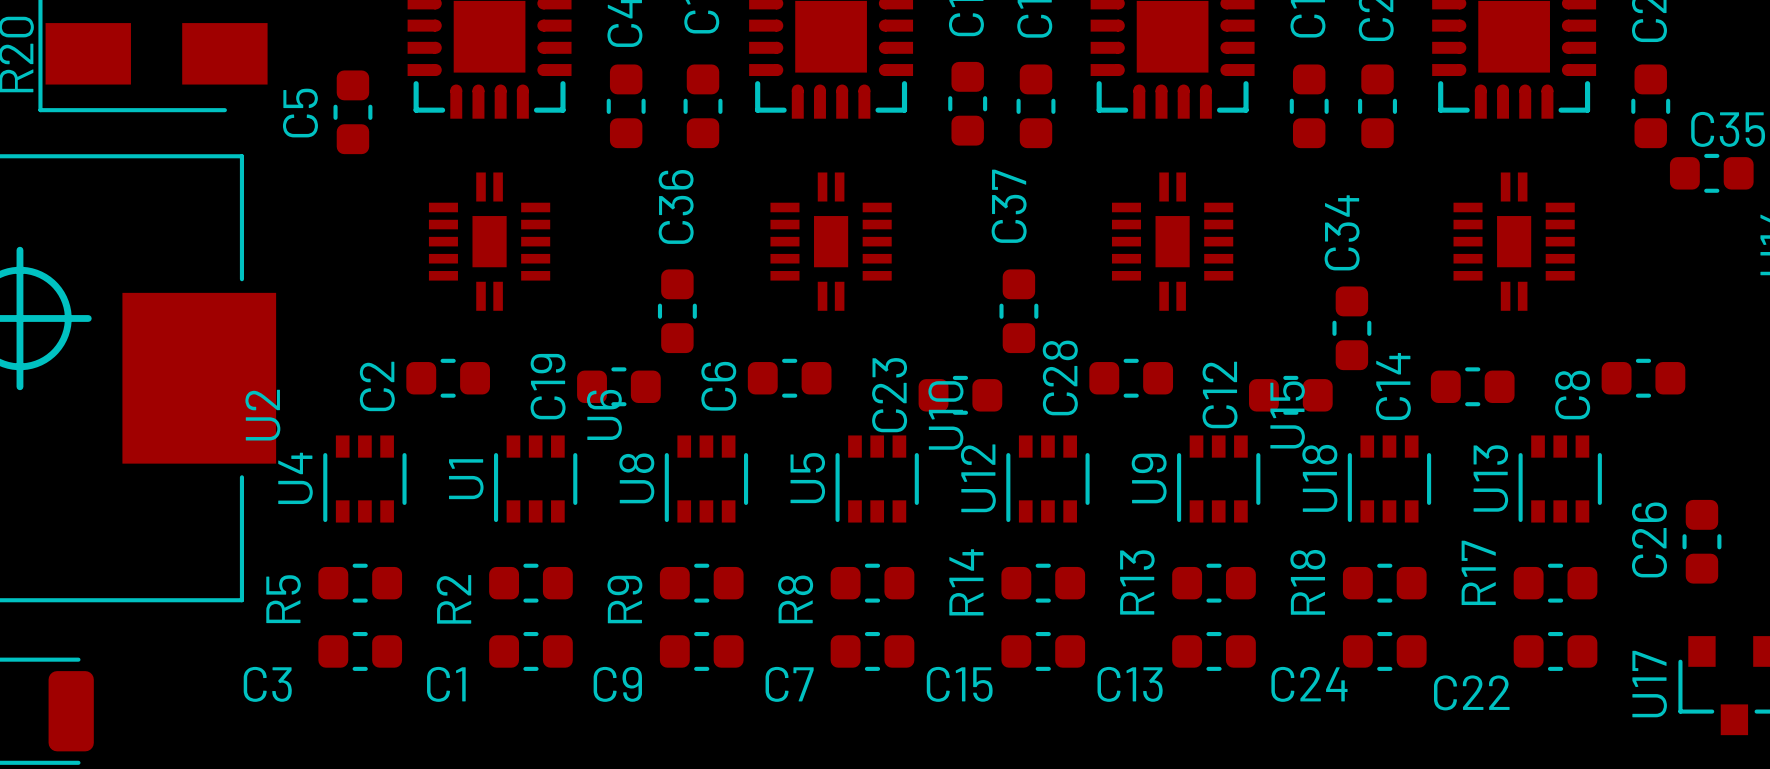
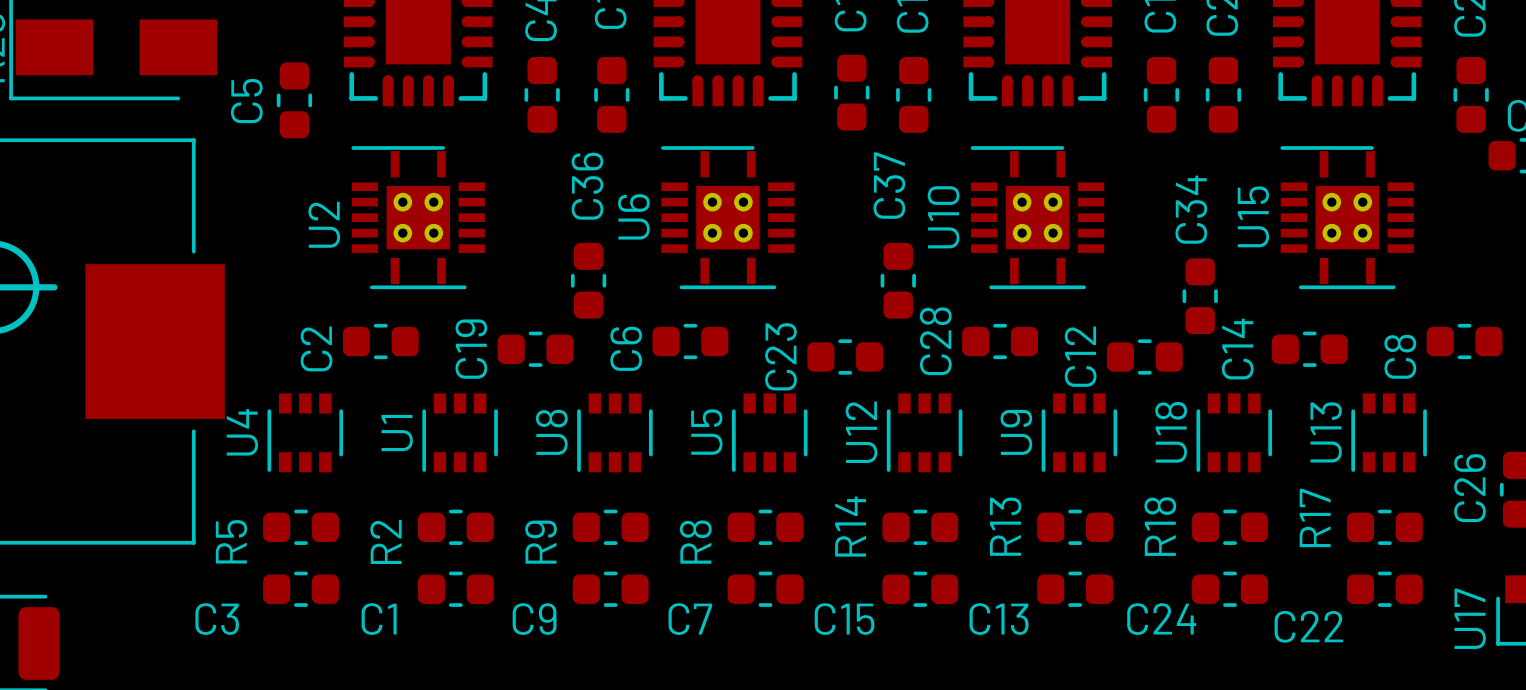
U2 footprint: [428, 172, 551, 311] -> [351, 146, 485, 290]
U6 footprint: [770, 172, 892, 311] -> [661, 146, 795, 290]
U10 footprint: [1111, 172, 1234, 311] -> [970, 146, 1105, 290]
U15 footprint: [1453, 172, 1575, 311] -> [1280, 146, 1414, 290]
U6 name position: U6 (604, 414) -> U6 (633, 216)
U15 name position: U15 (1287, 414) -> U15 (1253, 216)
U2 name position: U2 (262, 415) -> U2 (324, 224)
U10 name position: U10 (945, 415) -> U10 (943, 217)

